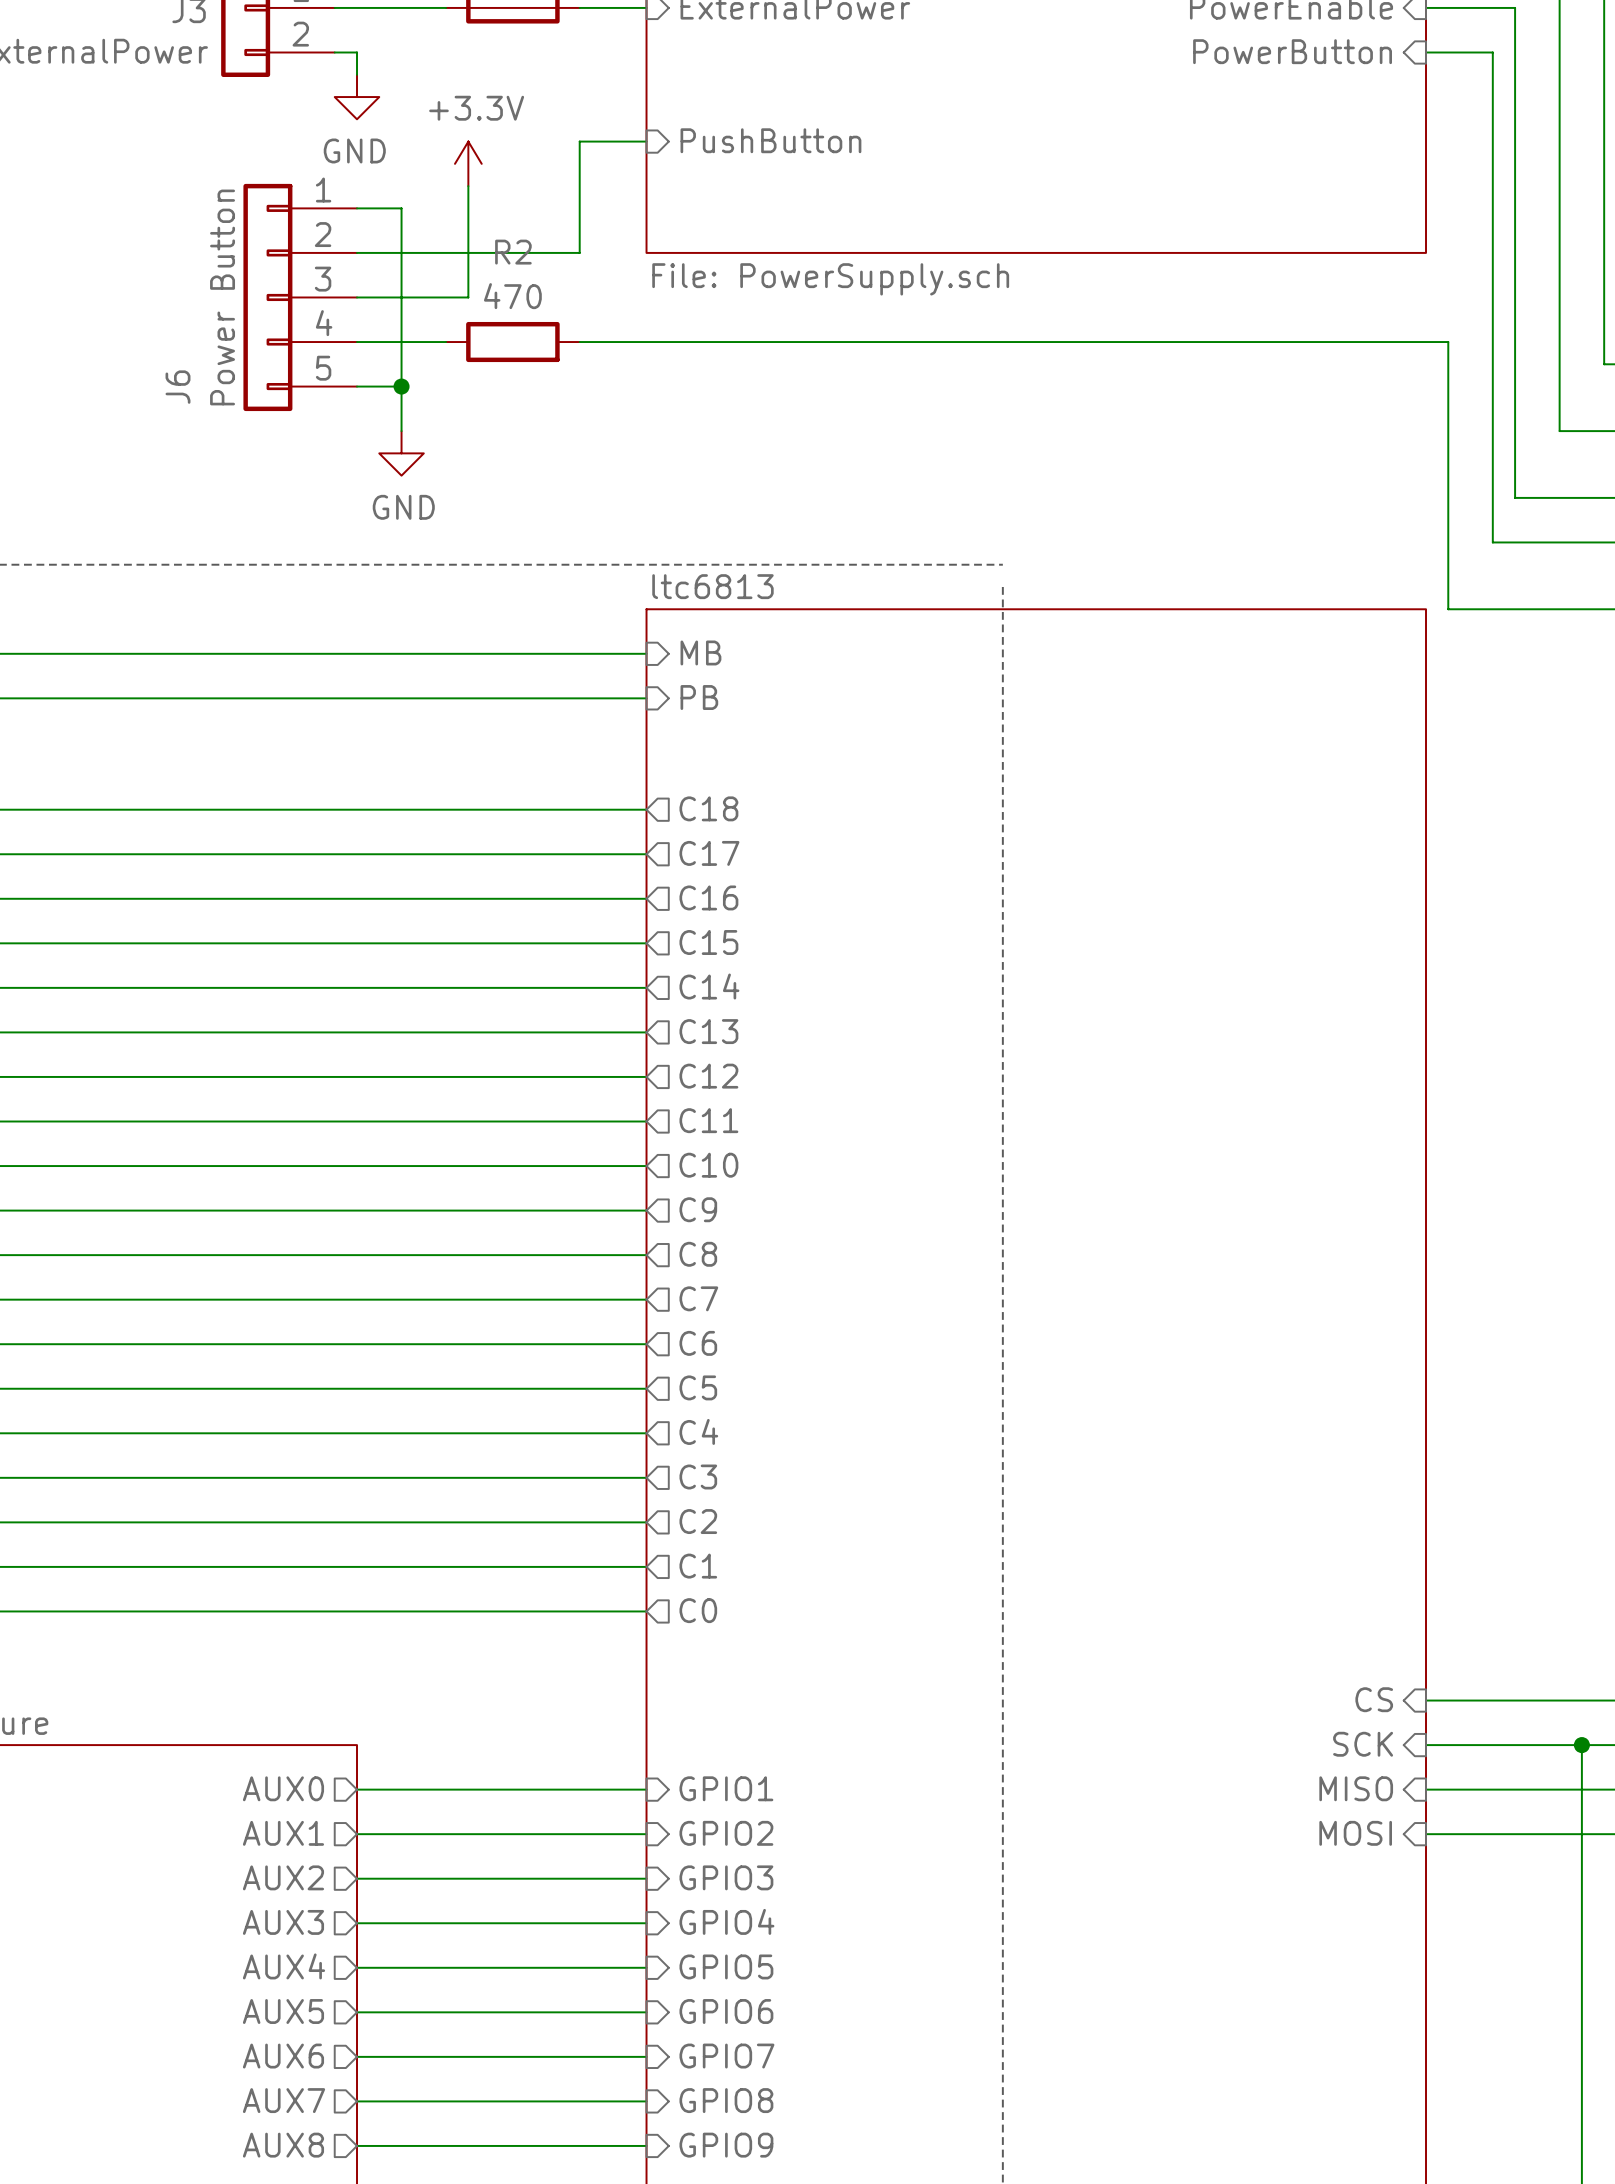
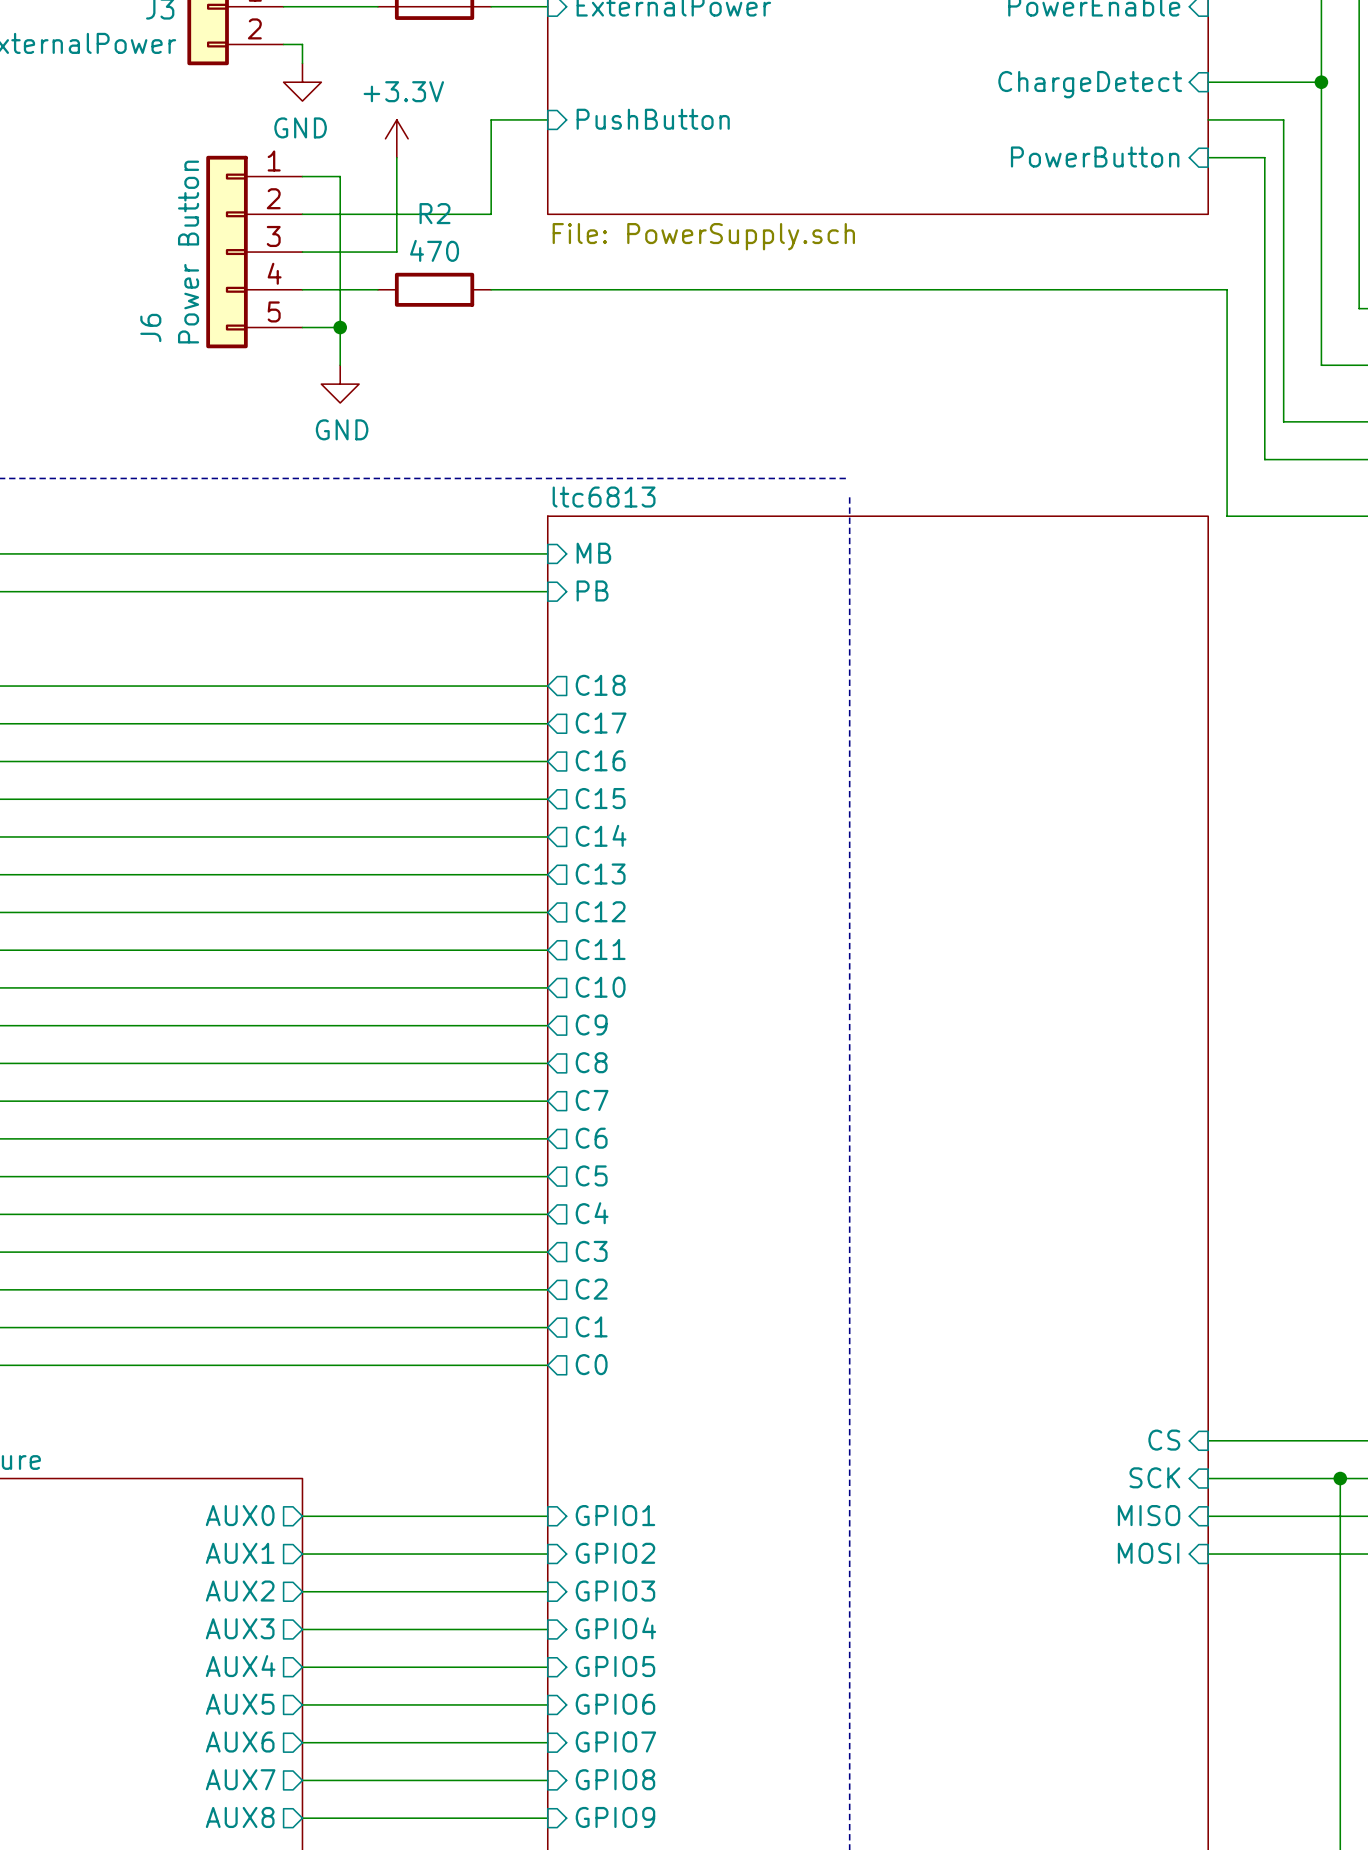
wire: (1426, 7) (1515, 7) (1515, 141) -> (1208, 119) (1283, 119)
sheet pin position: PowerButton (1292, 51) -> PowerButton (1095, 156)
wire: (1426, 52) (1492, 52) (1492, 186) -> (1208, 157) (1264, 157)
wire: none -> (1208, 82) (1321, 82)
junction: none -> (1321, 82)
sheet pin: none -> ChargeDetect (1090, 84)

